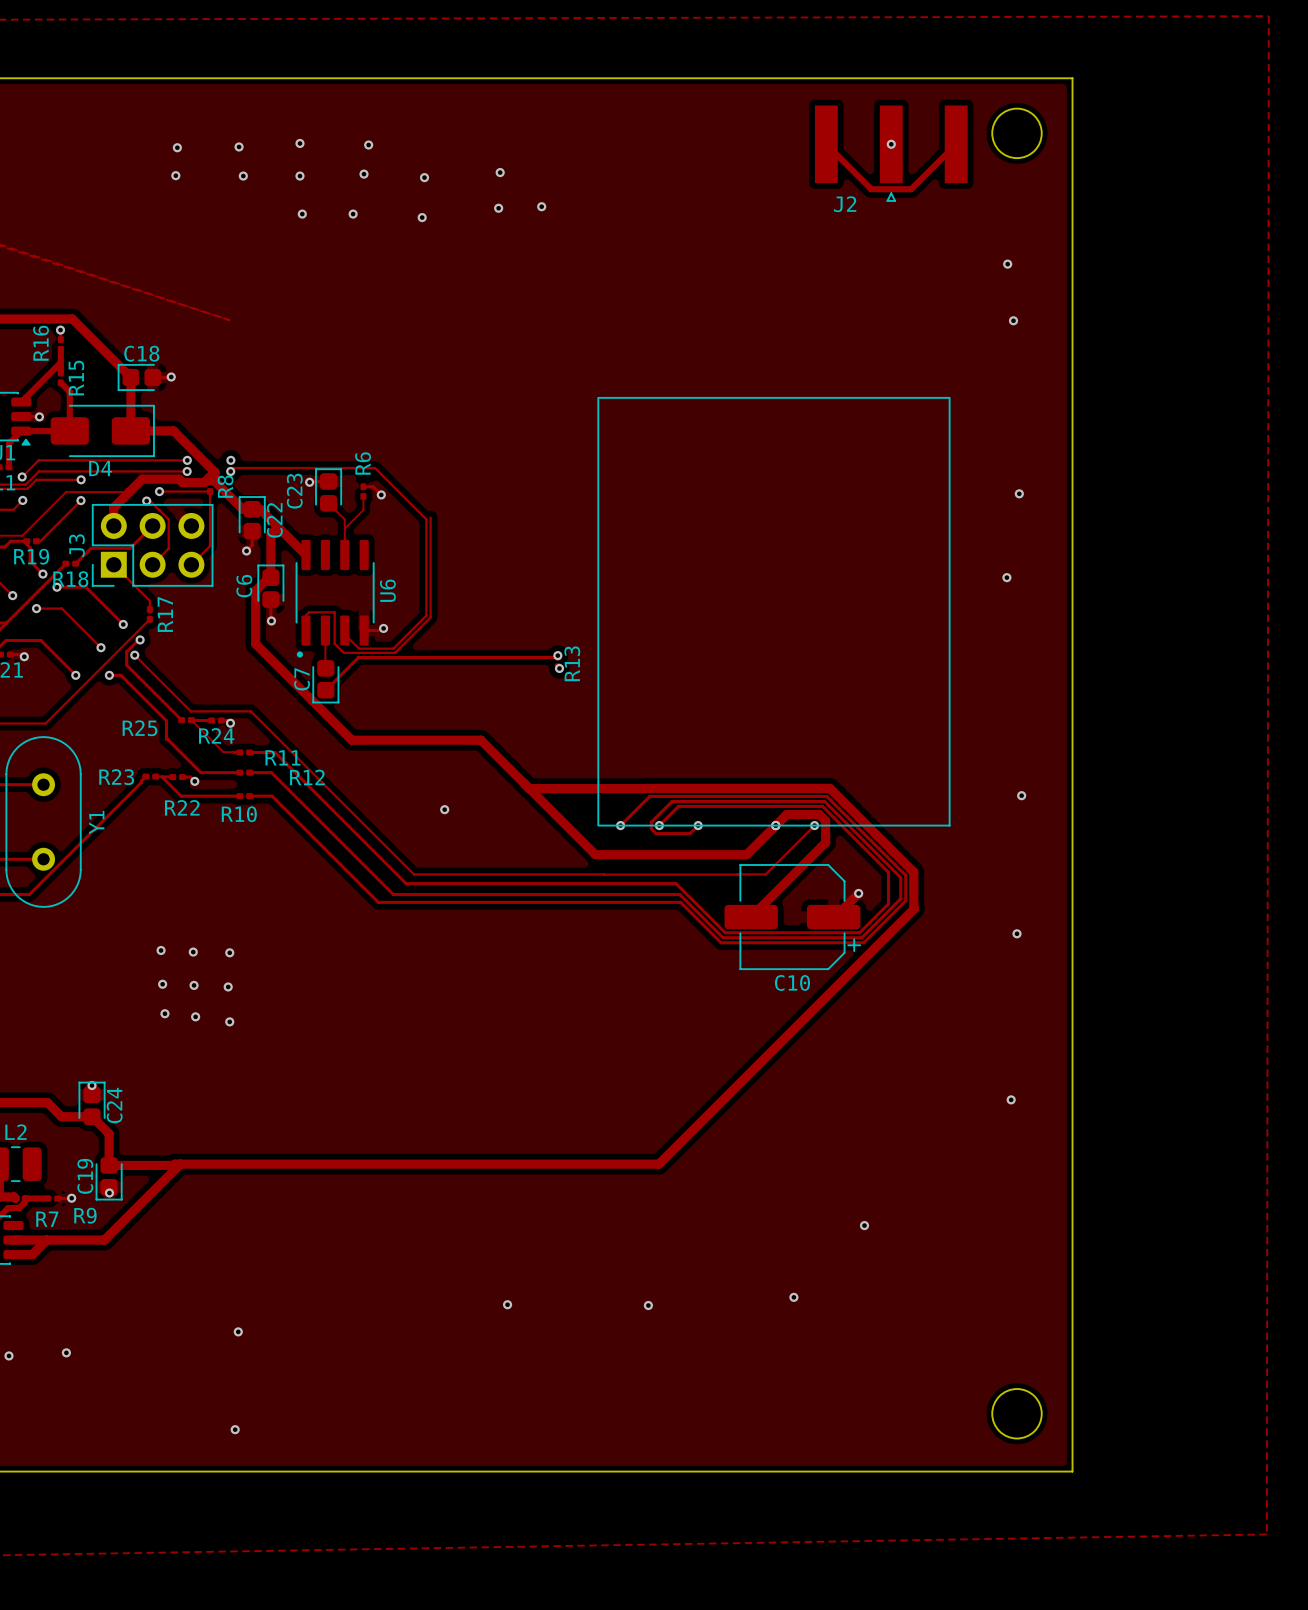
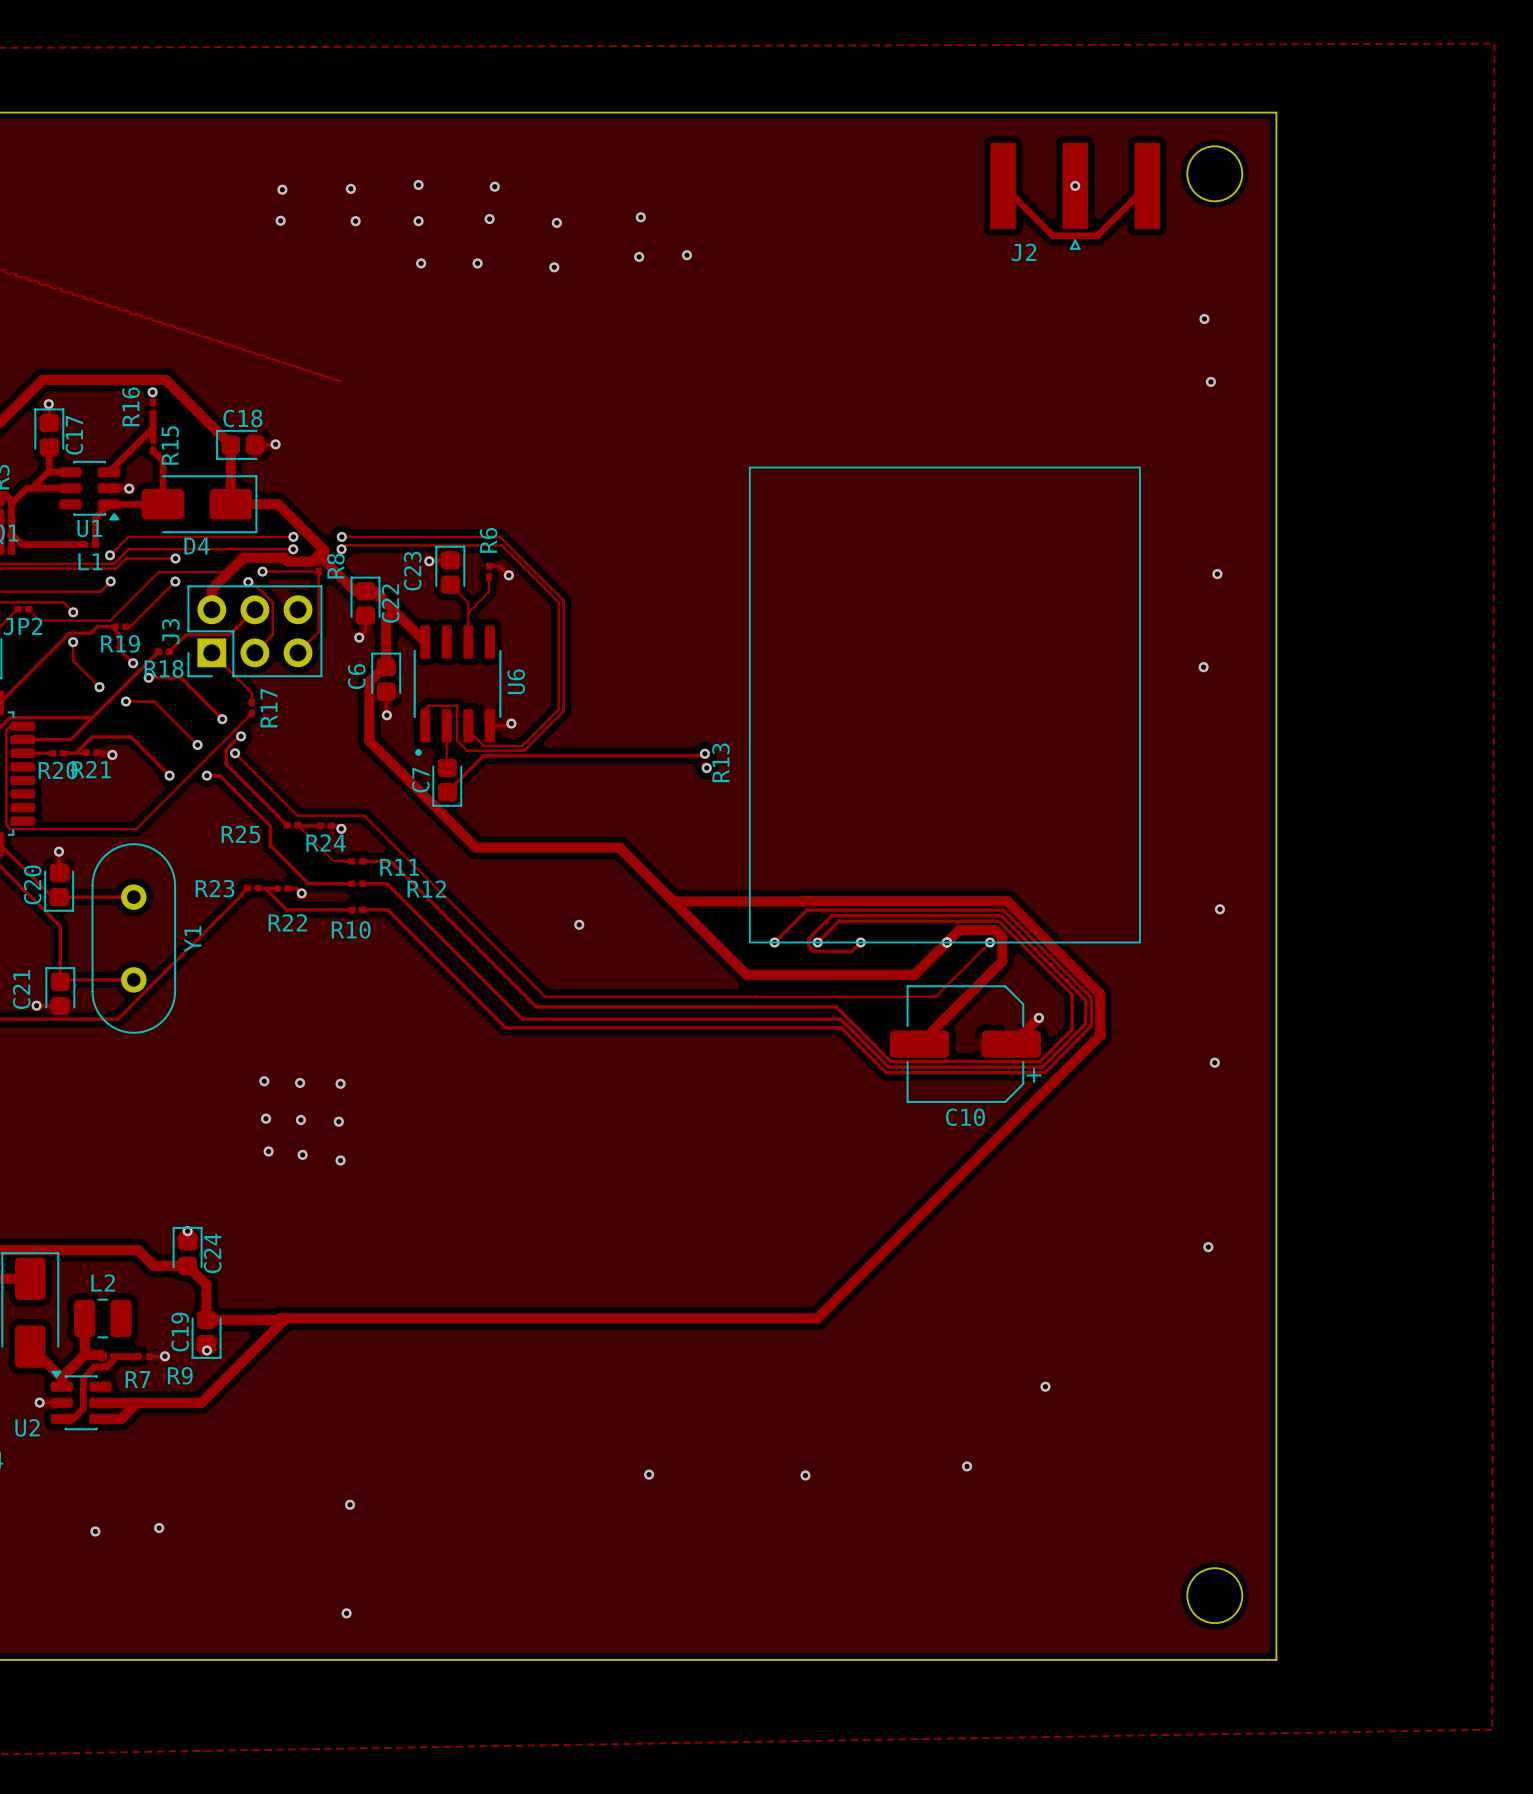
track: none -> (341, 536) (500, 536) (563, 600)

